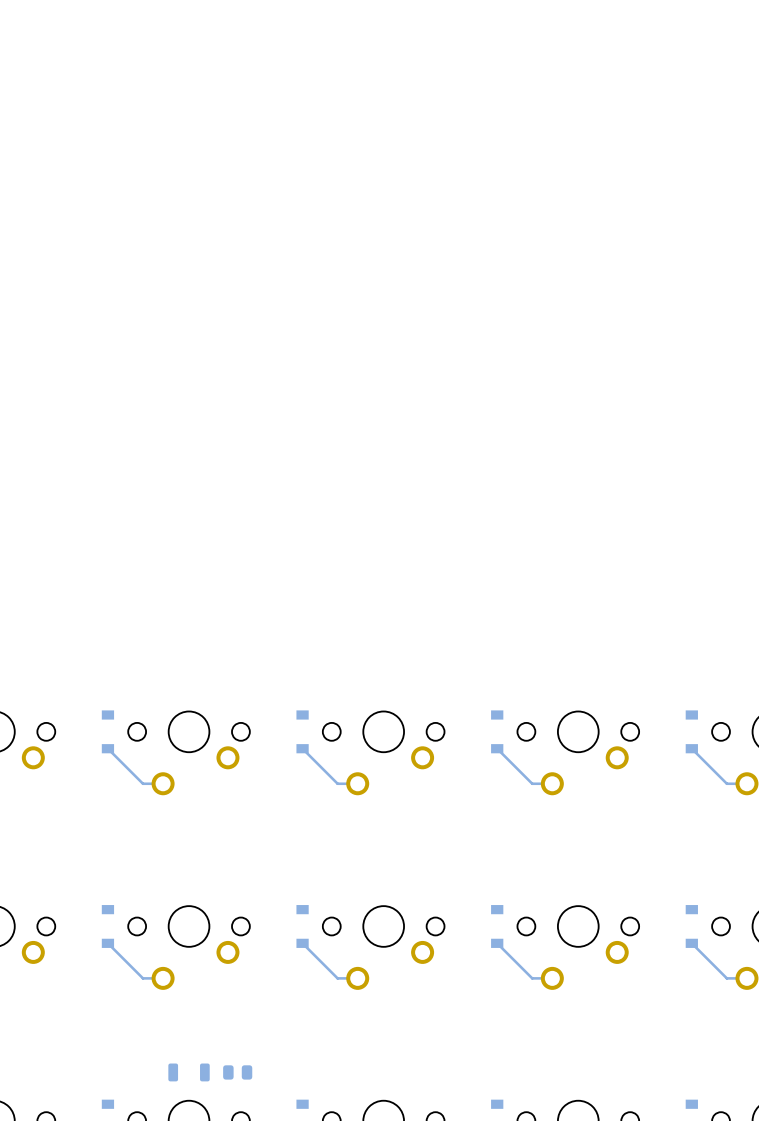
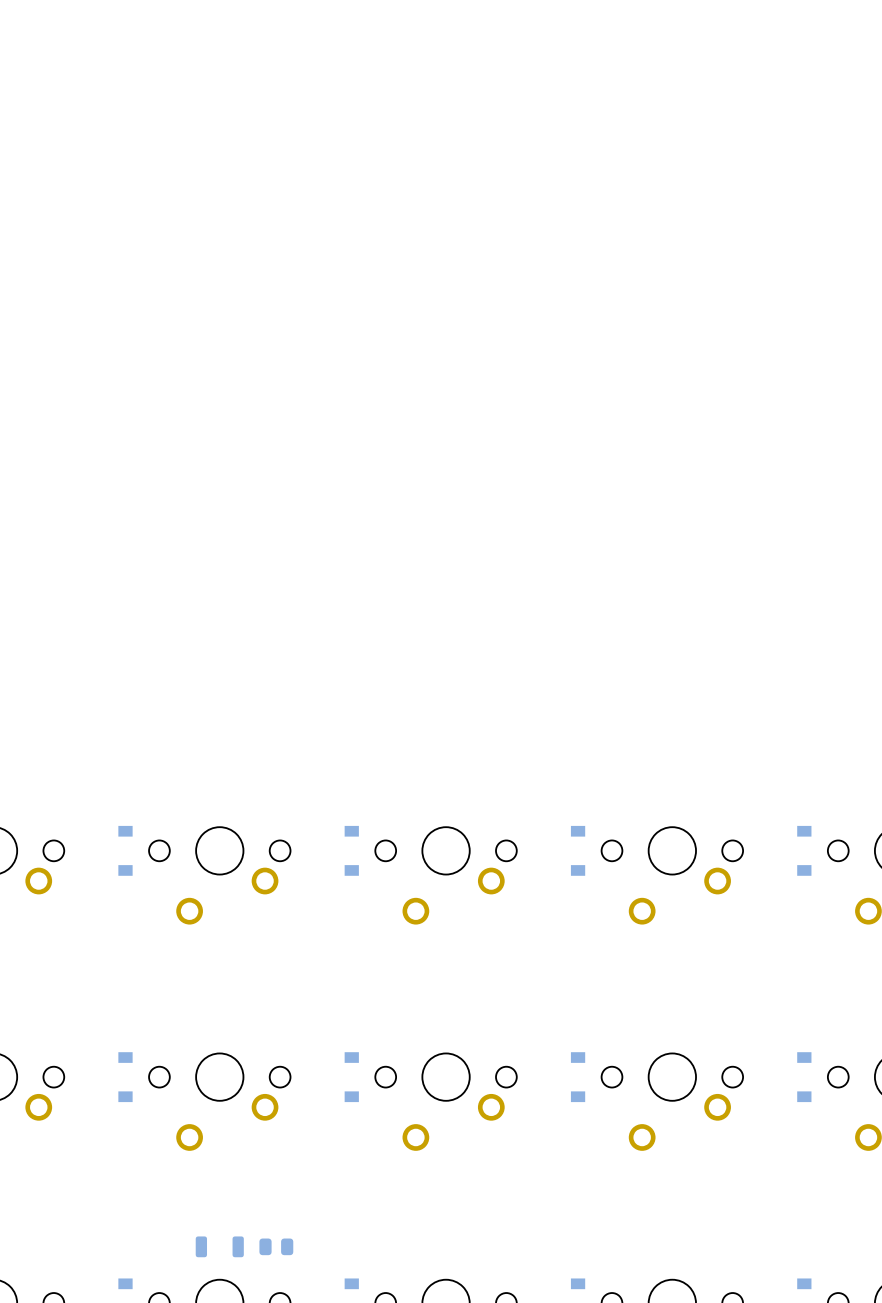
bottom track: (107, 748) (142, 783) (163, 783) -> none
bottom track: (302, 748) (337, 783) (357, 783) -> none
bottom track: (497, 748) (532, 783) (552, 783) -> none
bottom track: (691, 748) (726, 783) (746, 783) -> none
bottom track: (107, 943) (142, 978) (163, 978) -> none
bottom track: (302, 943) (337, 978) (357, 978) -> none
bottom track: (497, 943) (532, 978) (552, 978) -> none
bottom track: (691, 943) (726, 978) (746, 978) -> none

